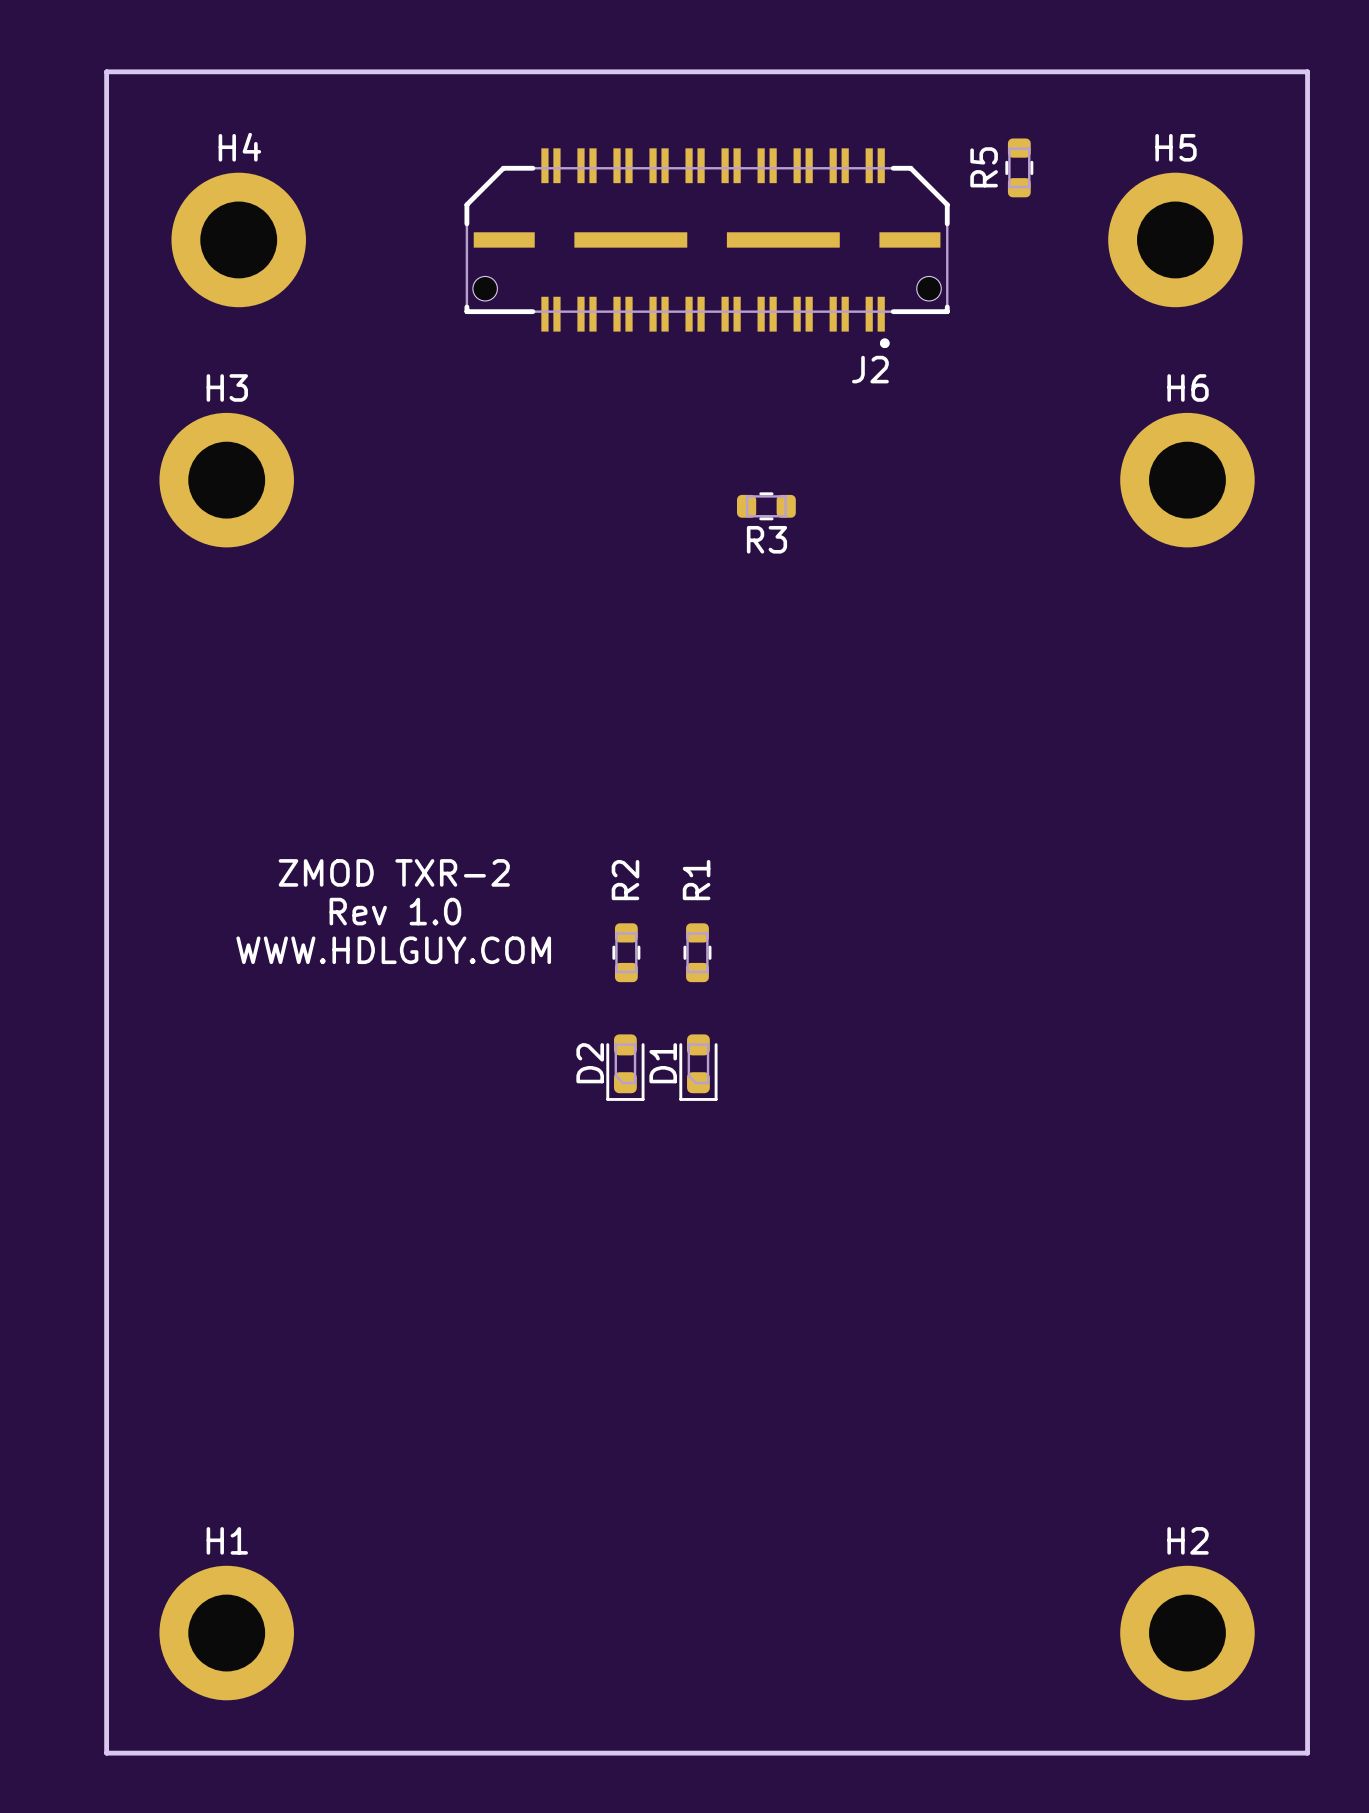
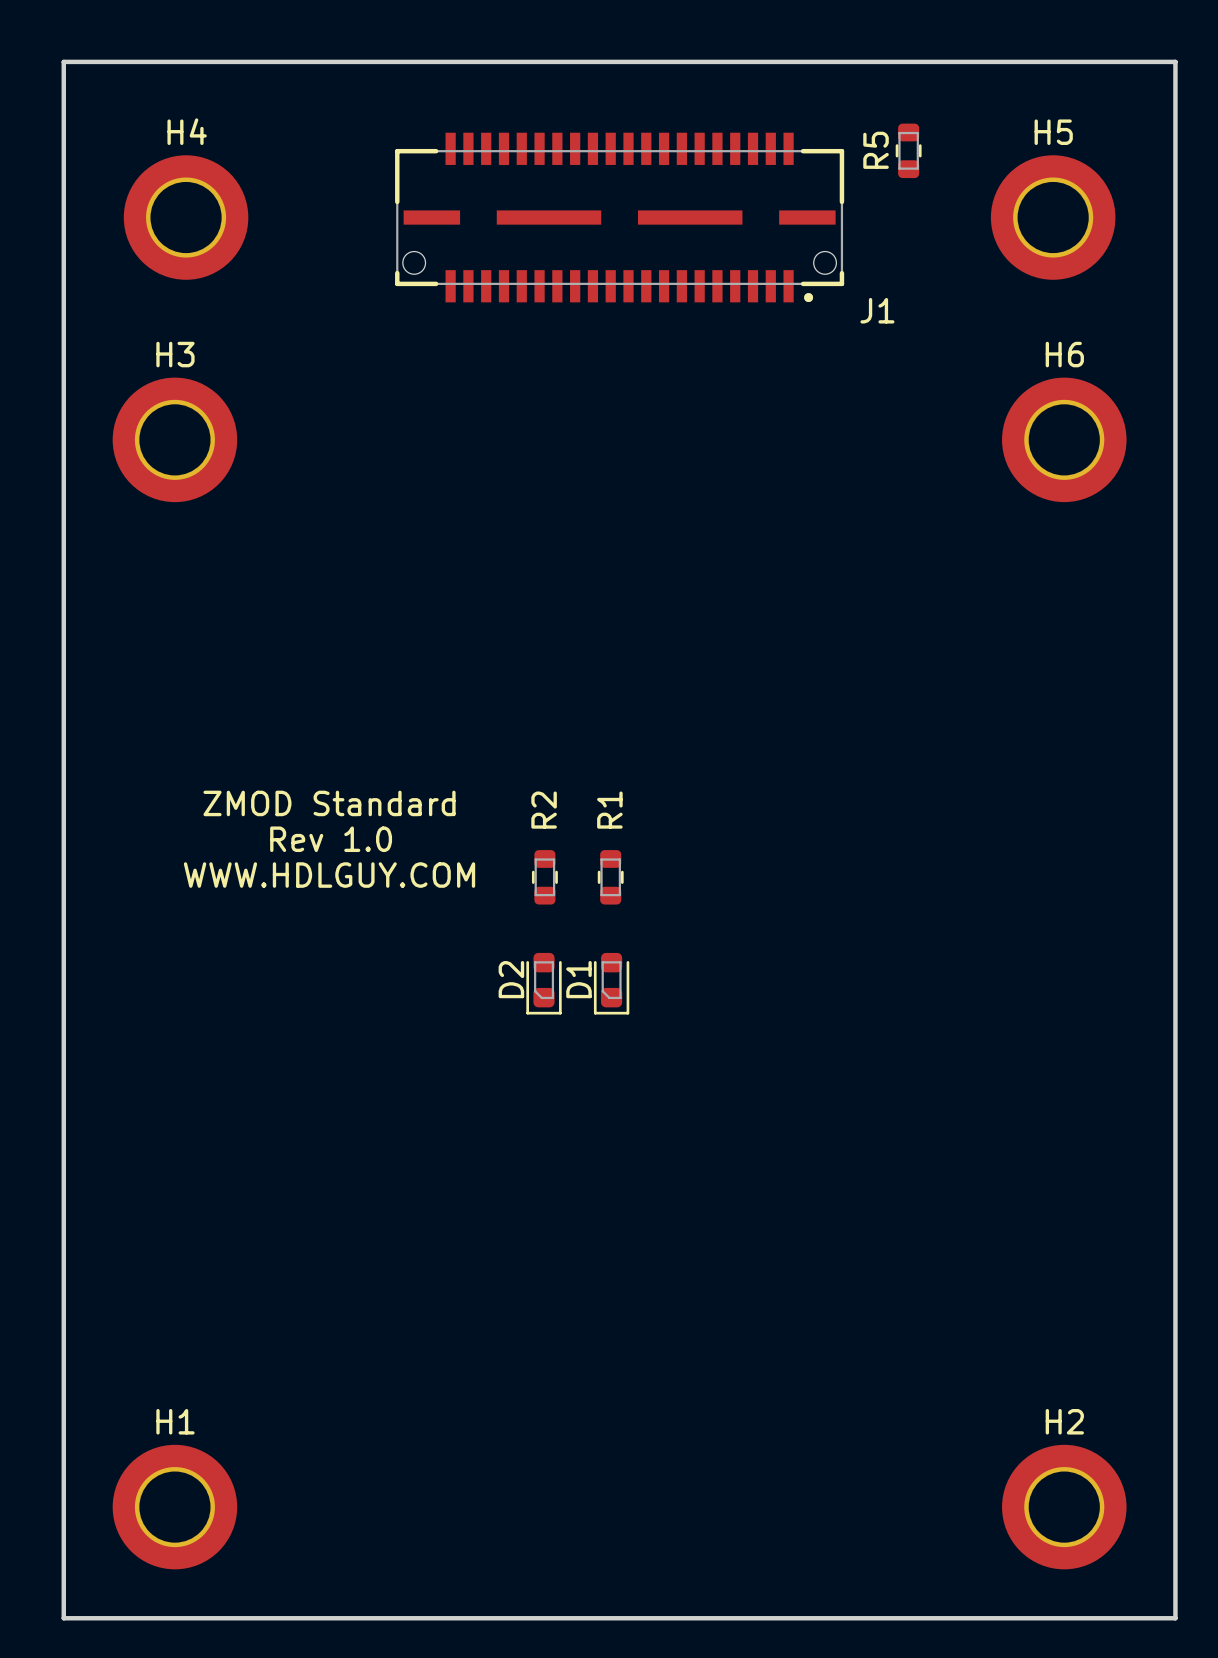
J1: none -> (619, 217)
J2: (707, 248) -> none
R3: (766, 506) -> none
text: ZMOD TXR-2 (394, 872) -> ZMOD Standard (329, 803)

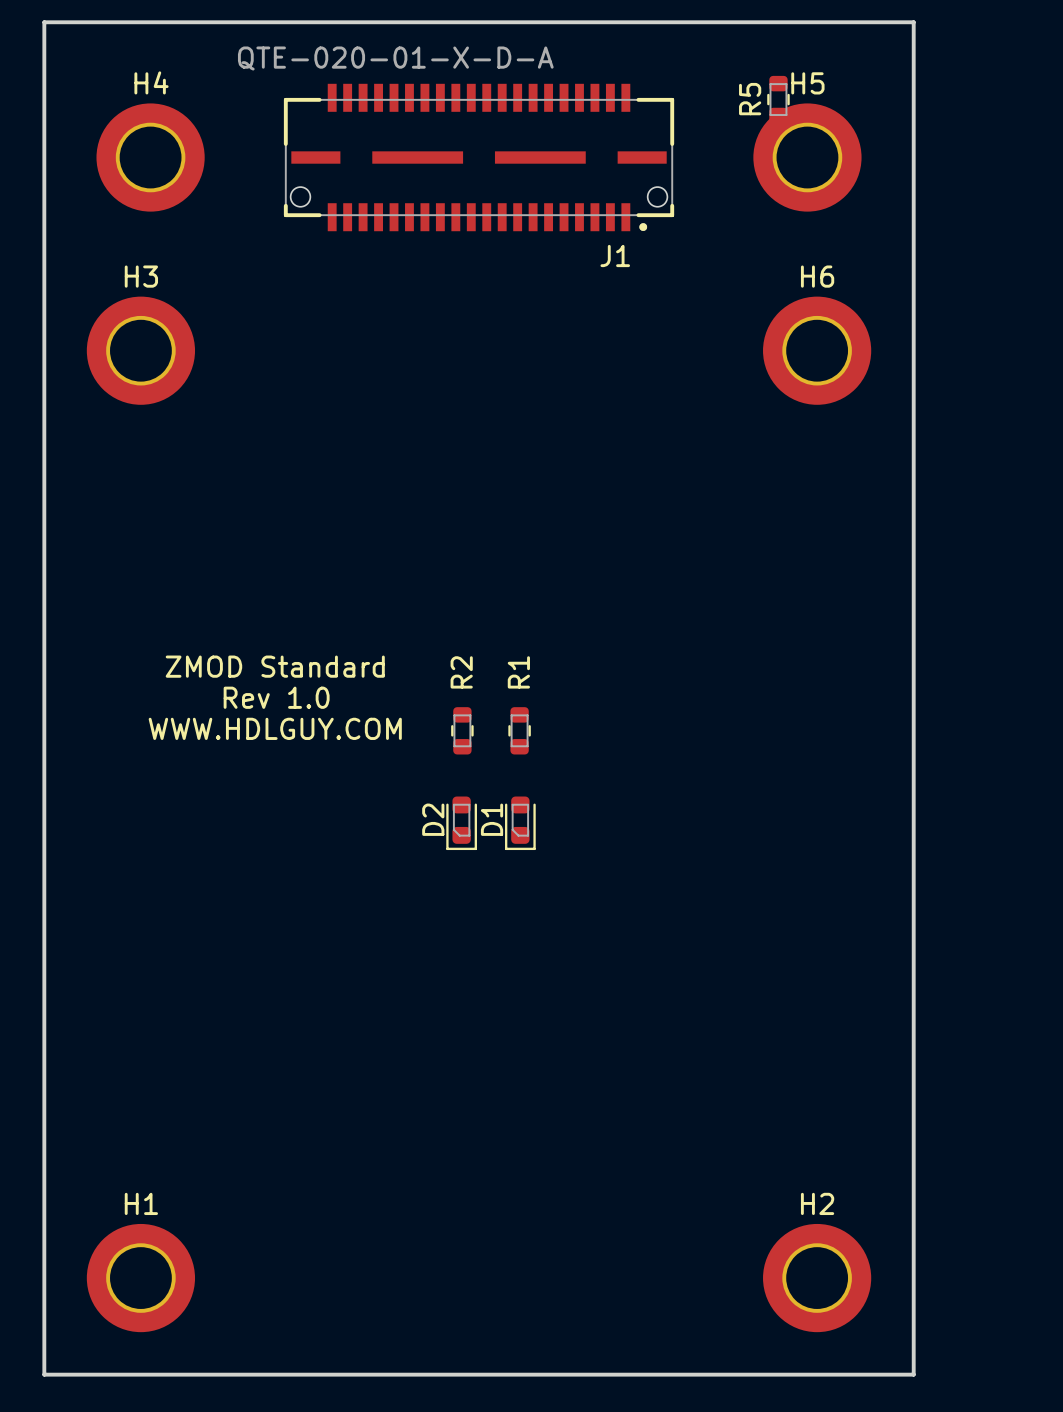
board edge: (1064, 61) (1175, 61) (1175, 1618) (1064, 1618) -> (913, 22) (913, 1374)
J1 value: none -> QTE-020-01-X-D-A (395, 58)
J1 position: (619, 217) -> (479, 157)
H5 position: (1053, 217) -> (807, 157)
J1 name position: J1 (877, 310) -> J1 (615, 256)
H6 position: (1064, 439) -> (817, 350)
H2 position: (1064, 1507) -> (817, 1278)

